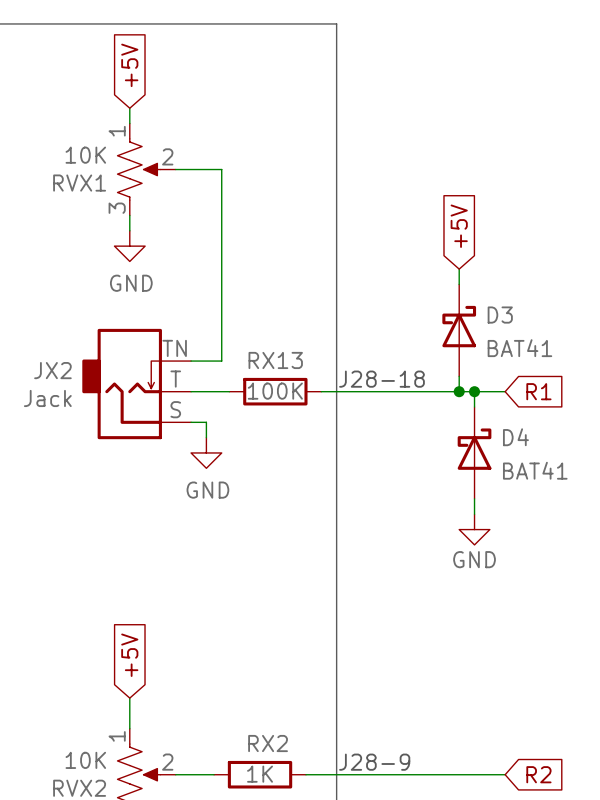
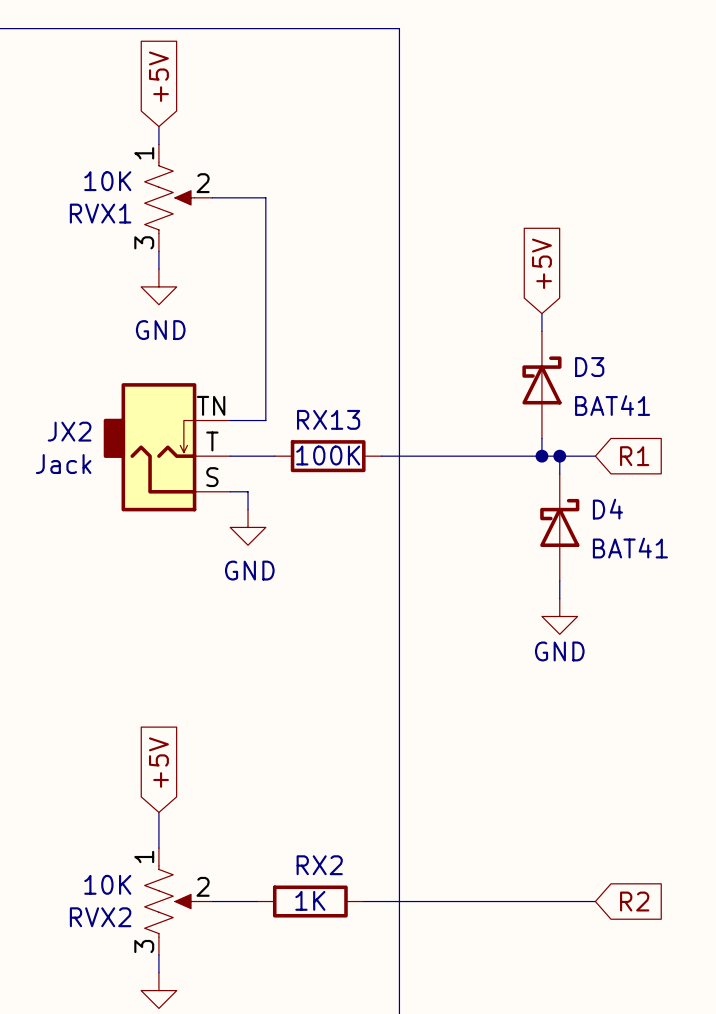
text: J28-18 (381, 379) -> none
text: J28-9 (374, 762) -> none

